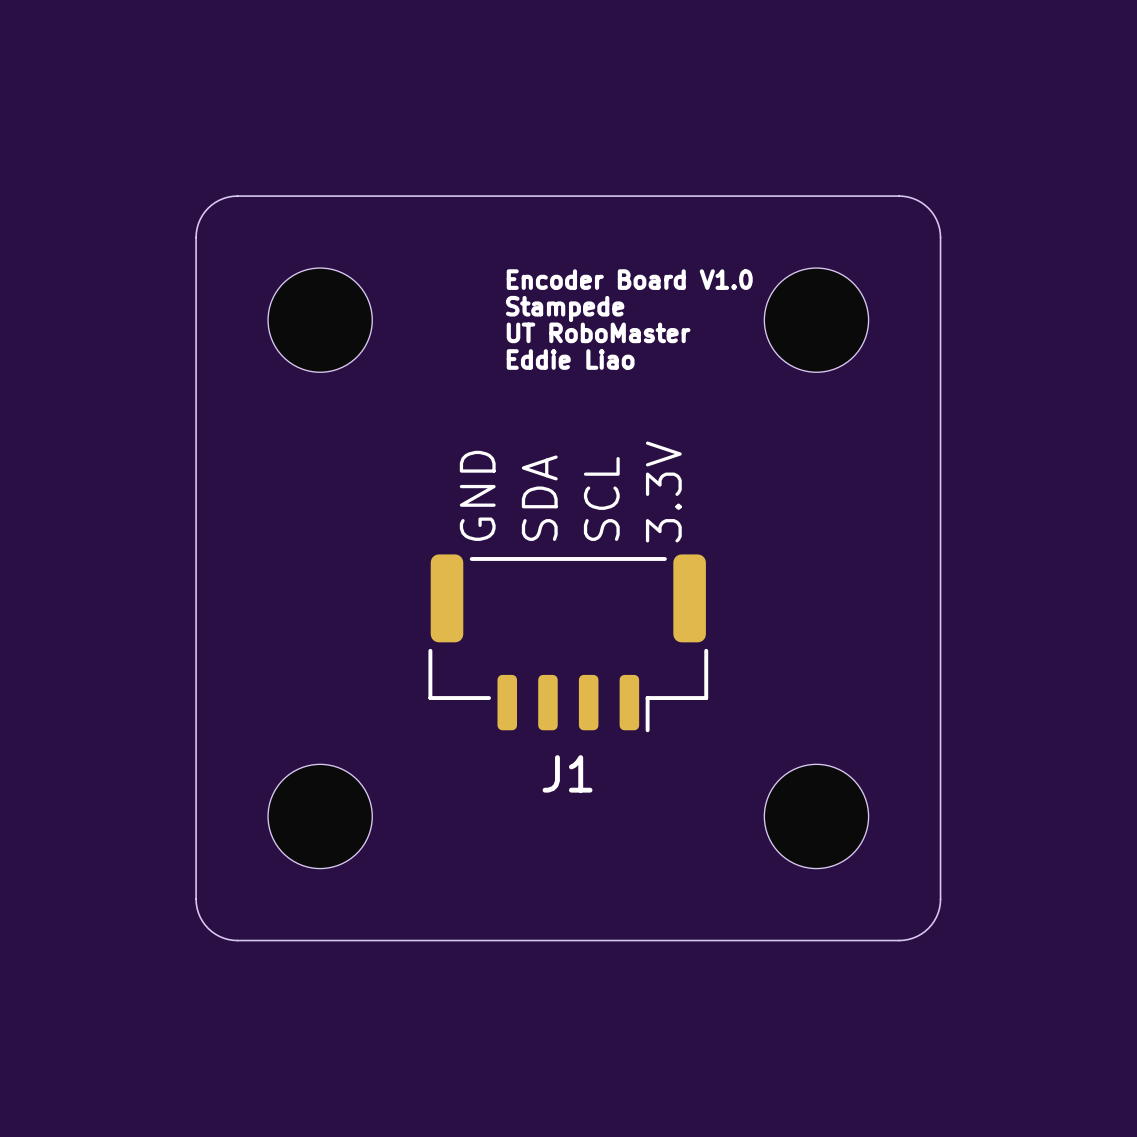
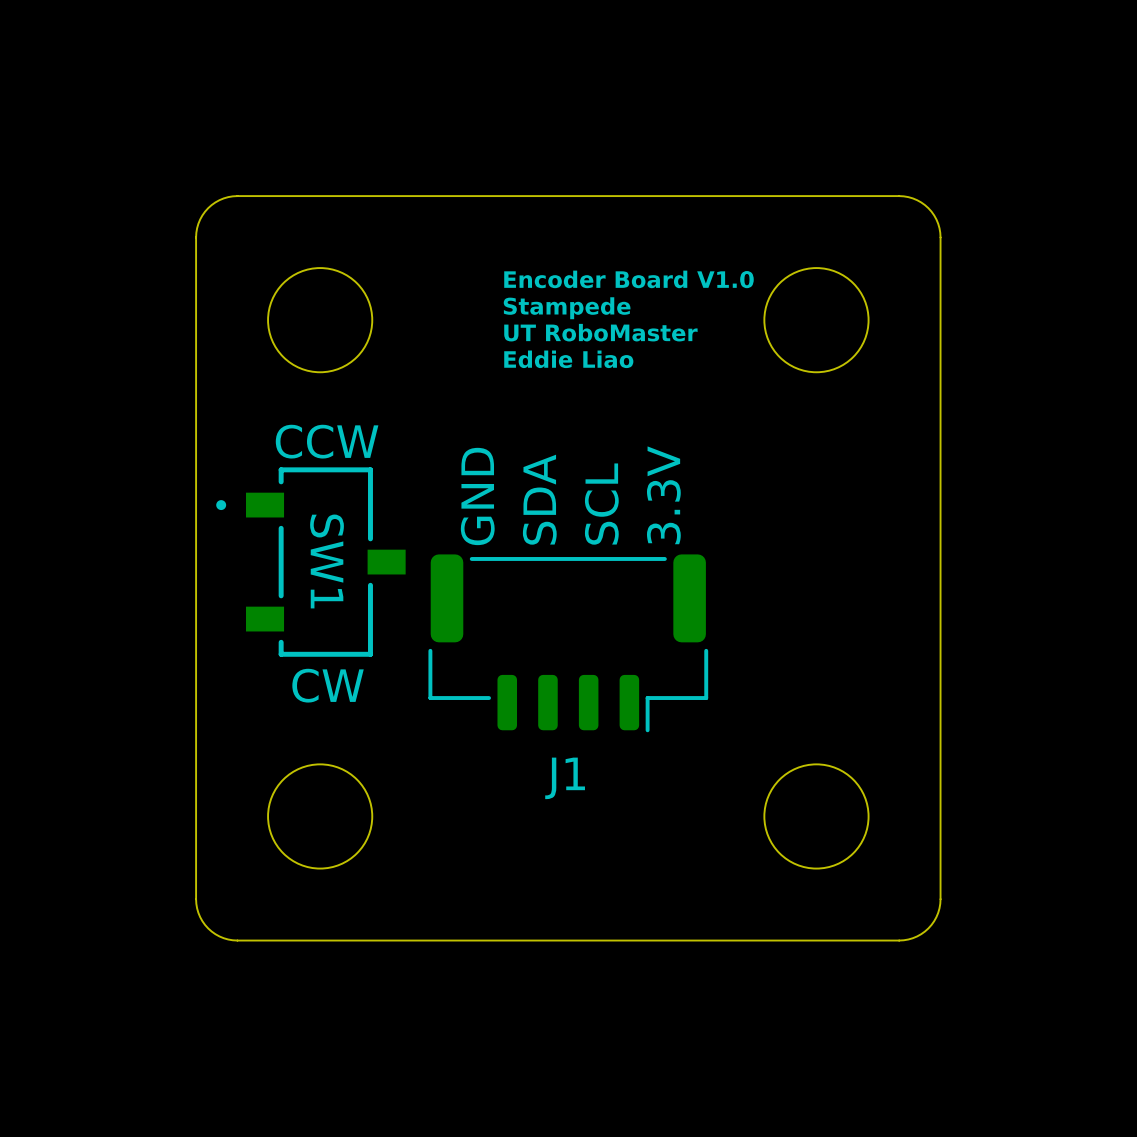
text: none -> CCW (327, 441)
SW1: none -> (310, 562)
text: none -> CW (328, 685)

